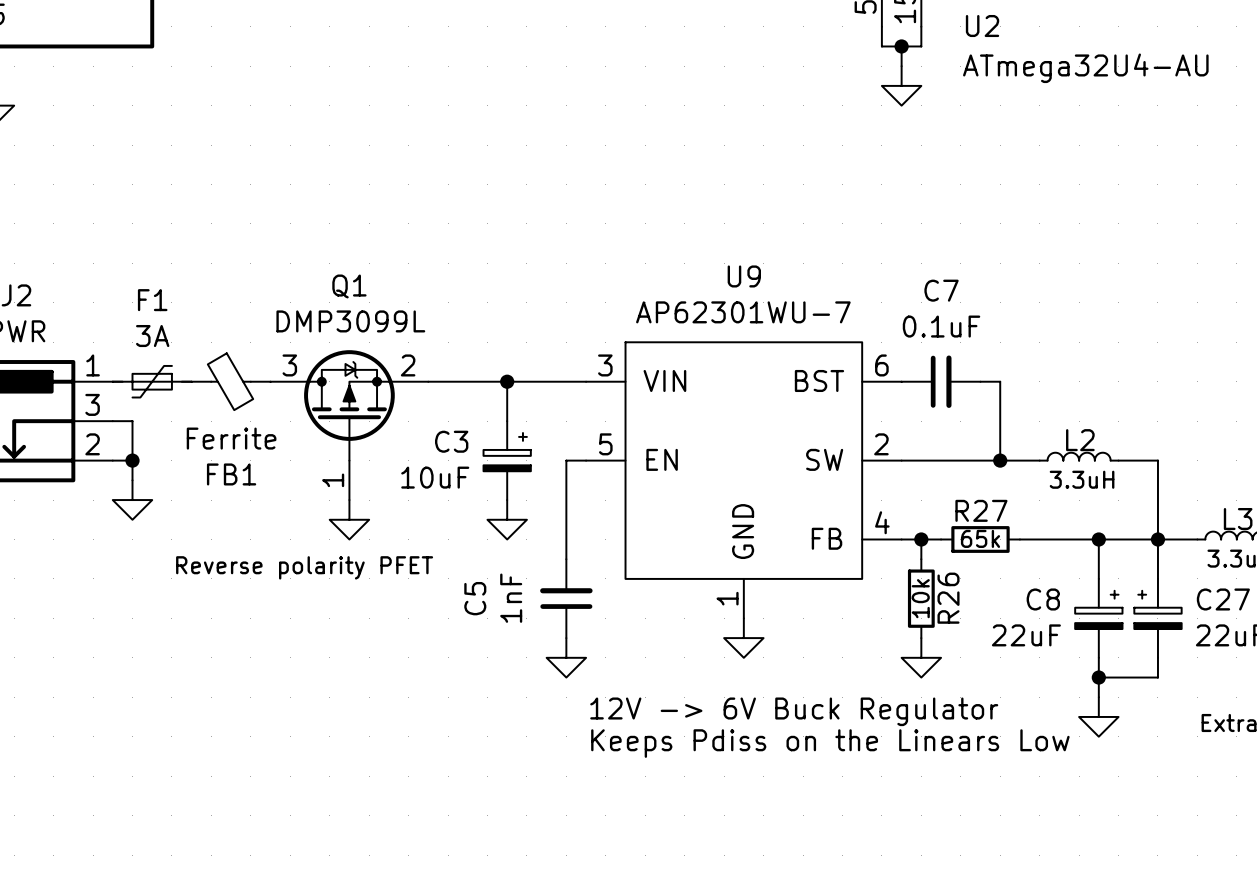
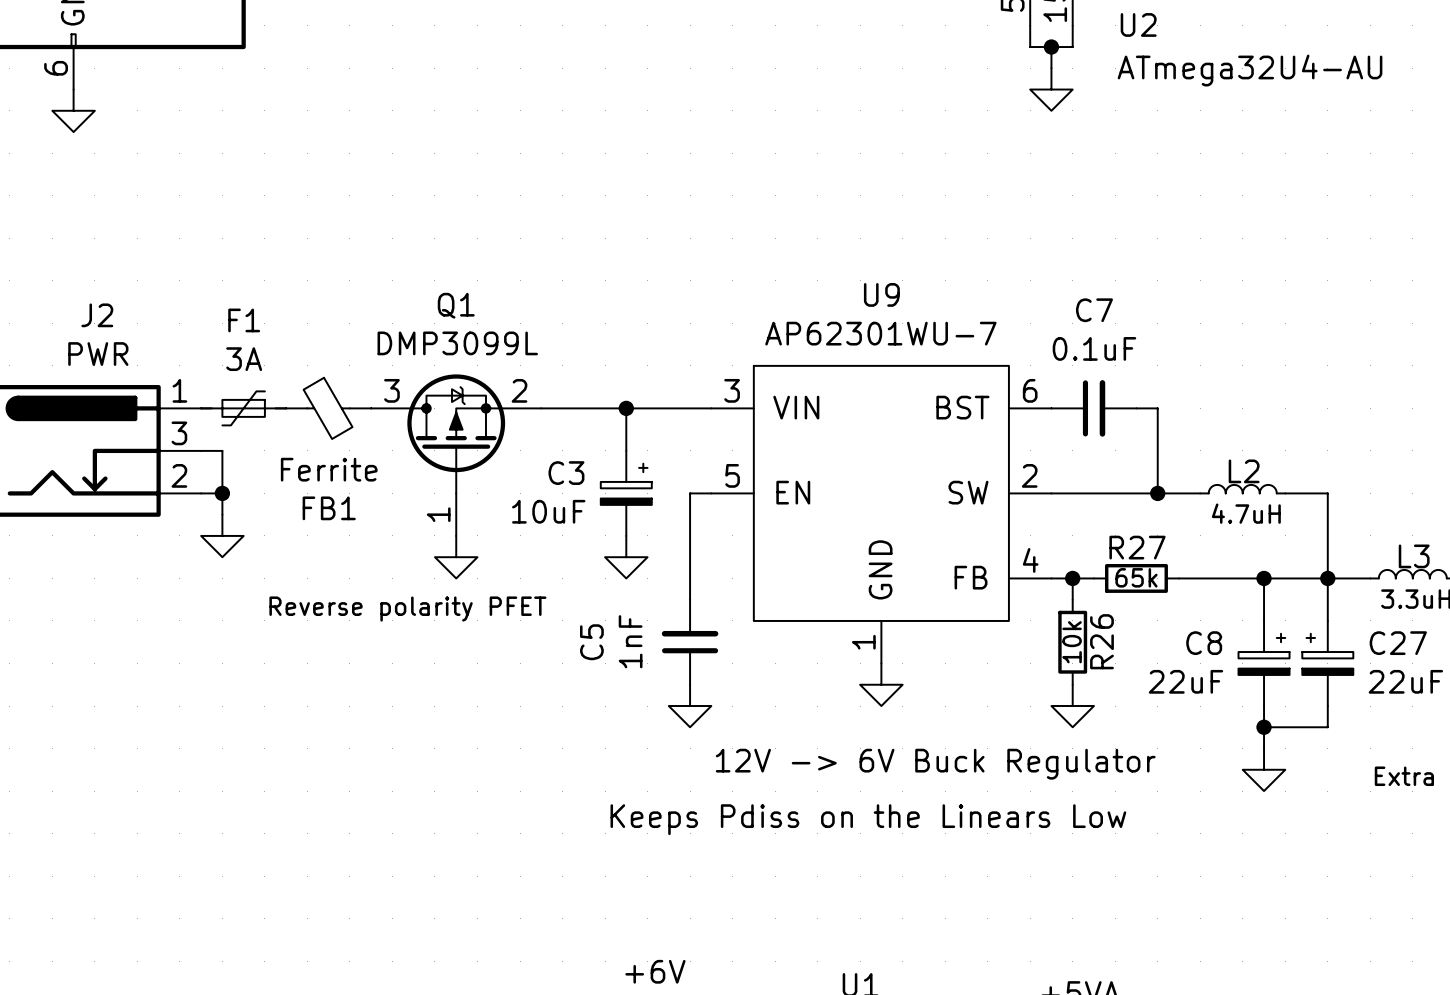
L2 value: 3.3uH (1082, 479) -> 4.7uH (1246, 513)
text position: Keeps Pdiss on the Linears Low (830, 743) -> Keeps Pdiss on the Linears Low (868, 819)

